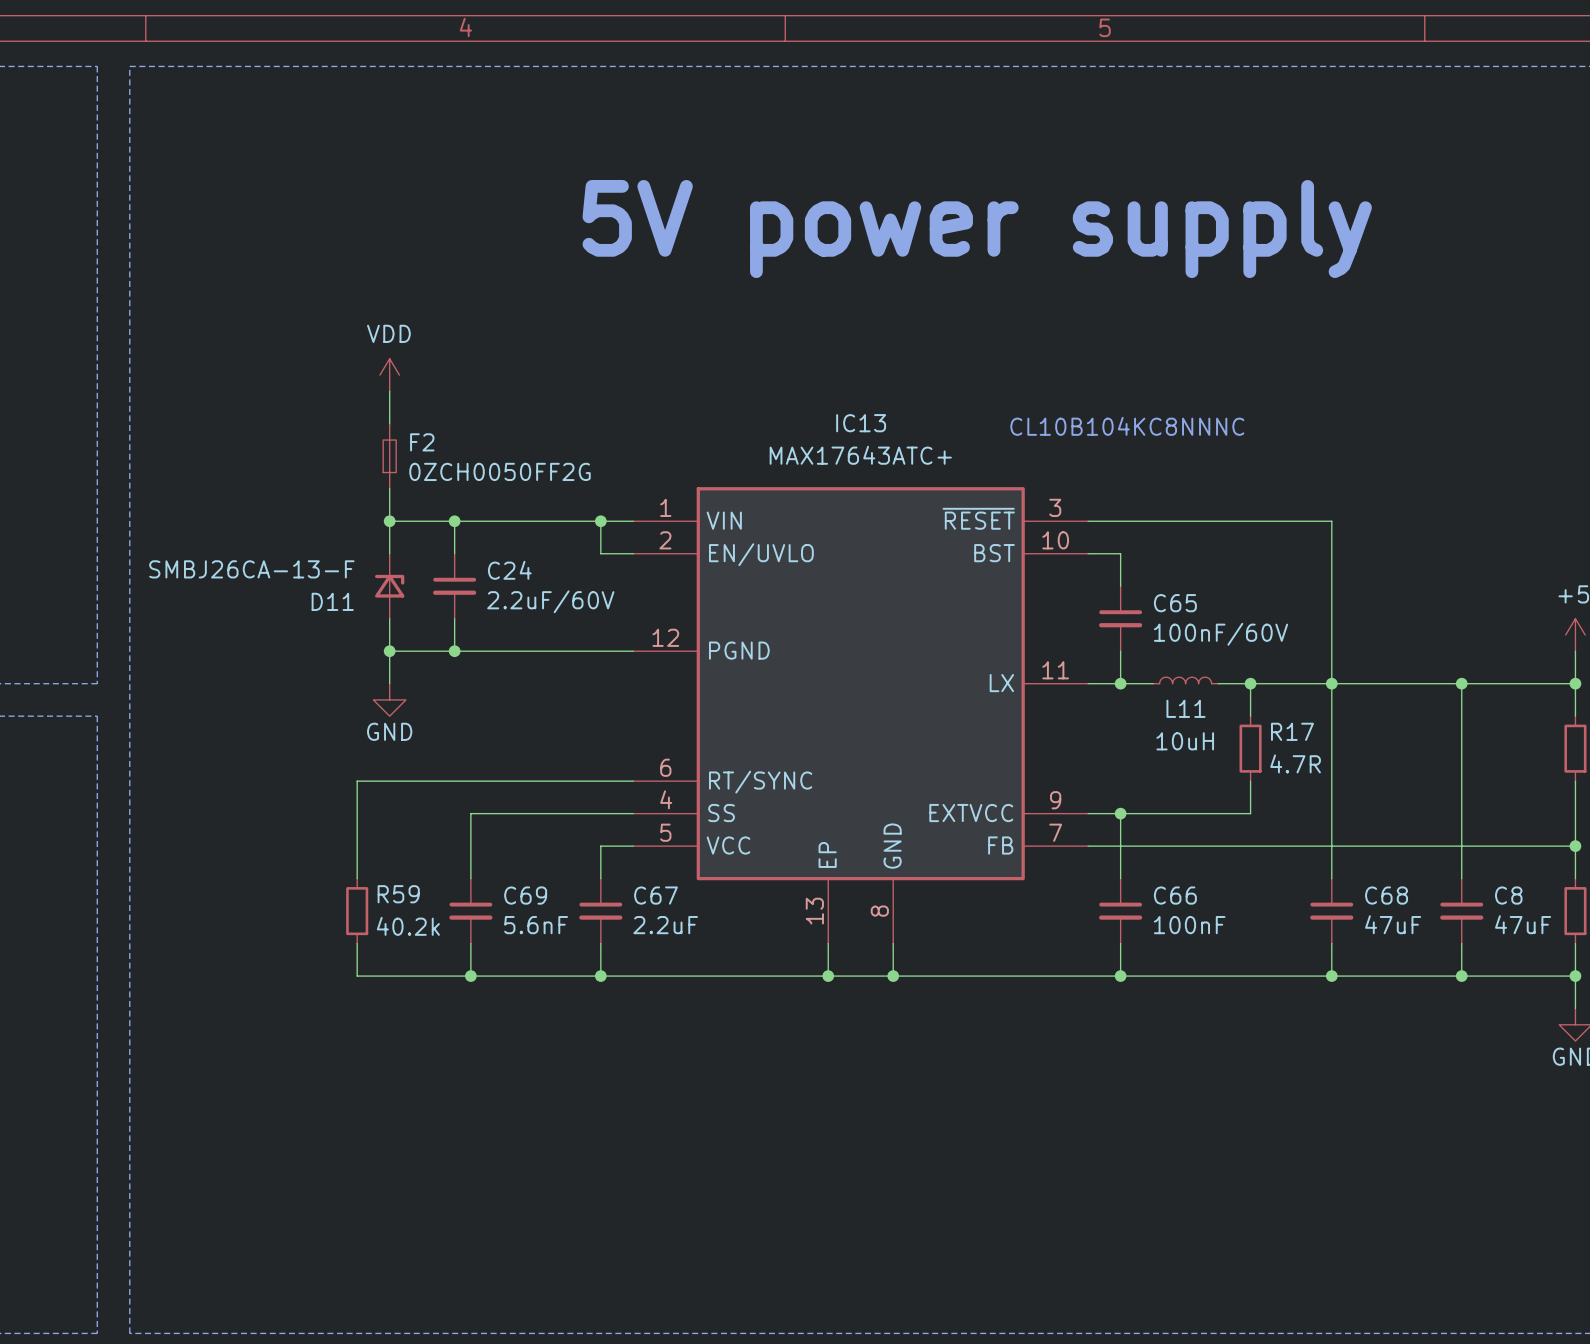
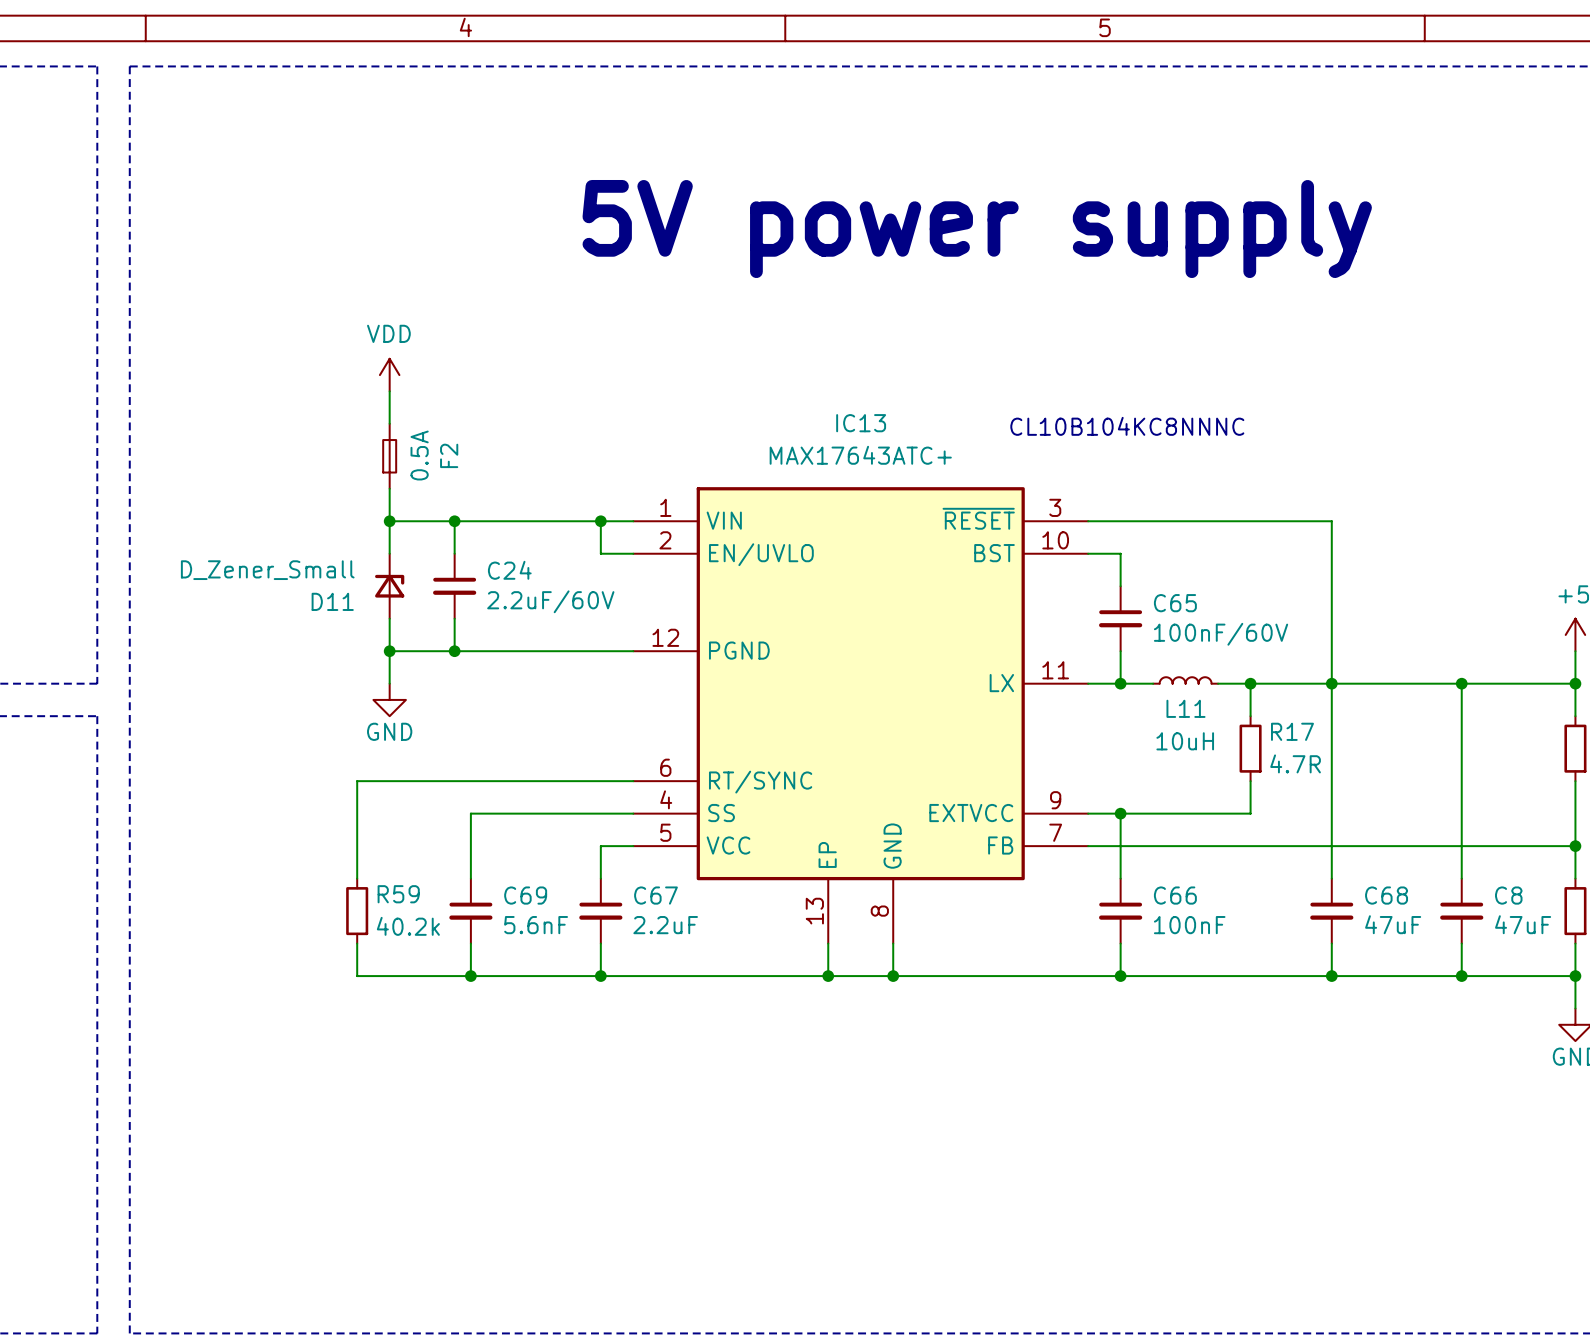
F2 name rotation: 0° (422, 442) -> 90° counterclockwise (449, 455)
F2 value: 0ZCH0050FF2G (500, 471) -> 0.5A (419, 455)
D11 value: SMBJ26CA-13-F (251, 569) -> D_Zener_Small (267, 570)

